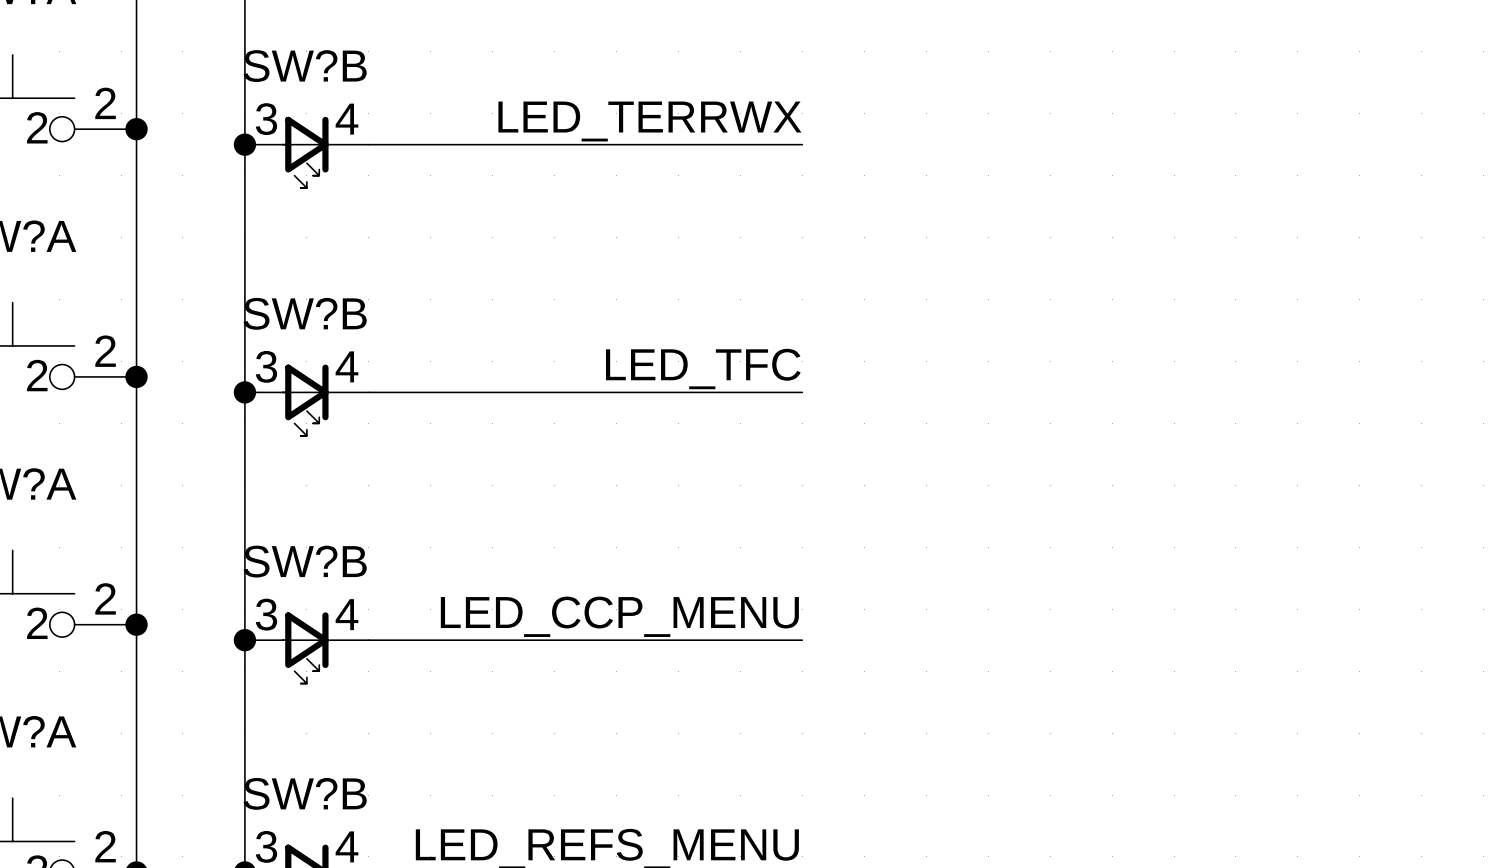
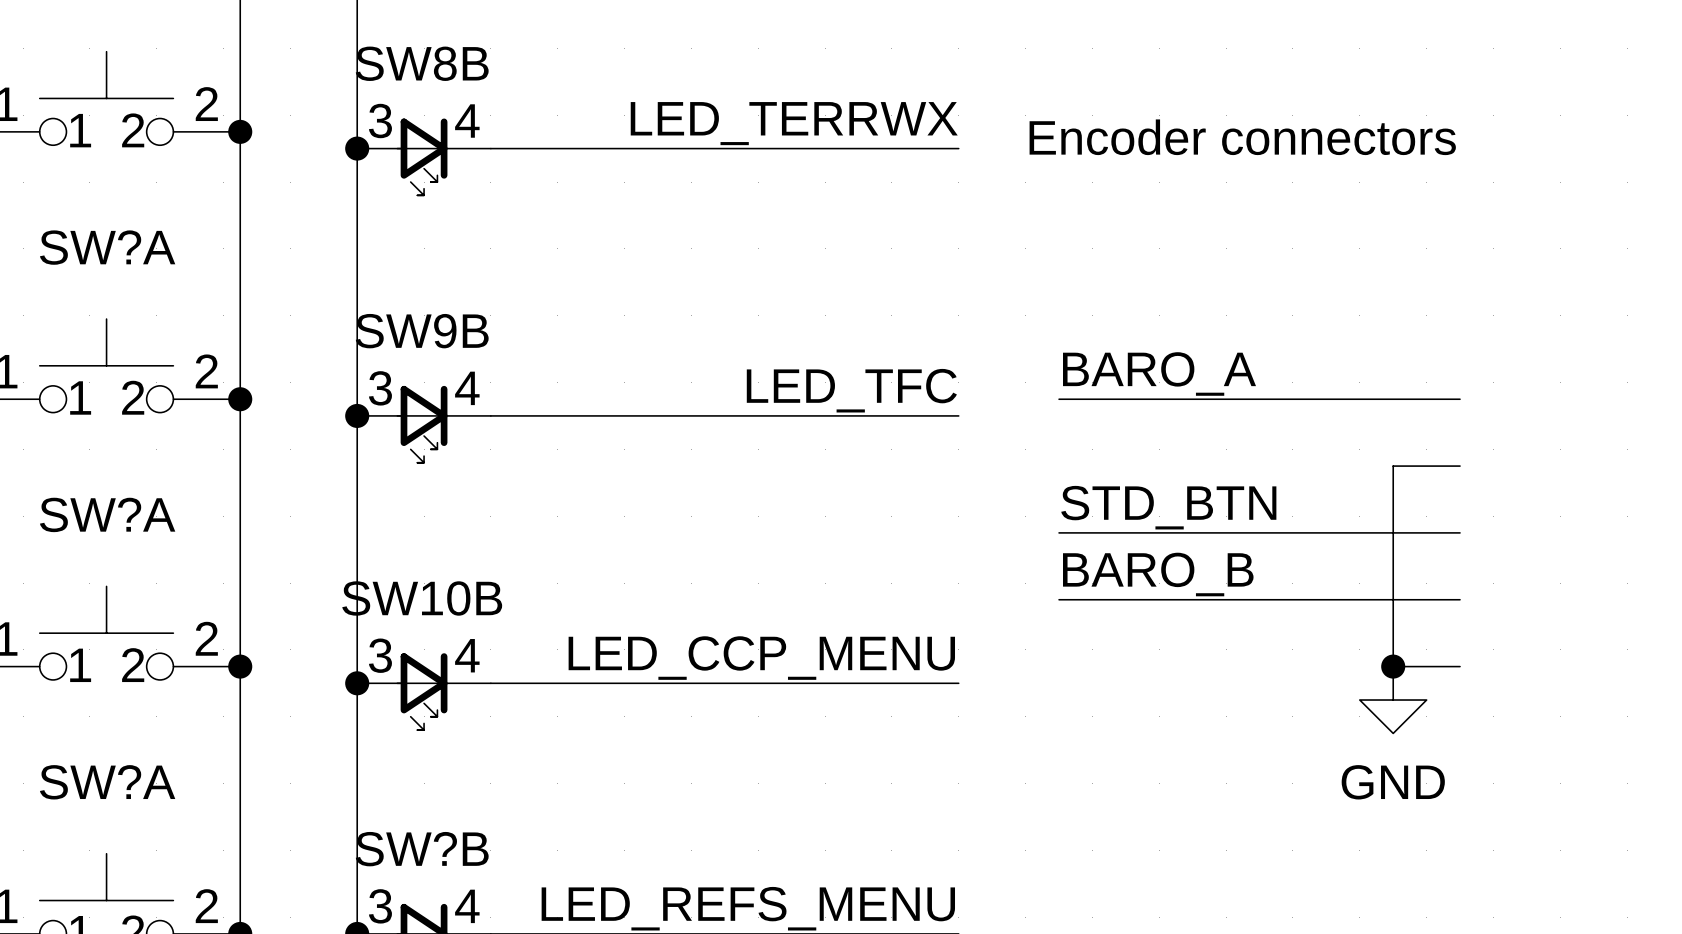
SW?B name: SW?B (305, 66) -> SW8B (422, 63)
text: none -> Encoder connectors (1242, 137)
SW?B name: SW?B (305, 313) -> SW9B (422, 331)
label: none -> BARO_A (1159, 373)
wire: none -> (1059, 399) (1460, 399)
wire: none -> (1460, 466) (1393, 466) (1393, 666) (1460, 666)
label: none -> STD_BTN (1168, 507)
wire: none -> (1059, 532) (1460, 532)
label: none -> BARO_B (1158, 574)
SW?B name: SW?B (305, 561) -> SW10B (422, 598)
wire: none -> (1059, 599) (1460, 599)
junction: none -> (1393, 666)
power symbol: none -> GND (1393, 700)

